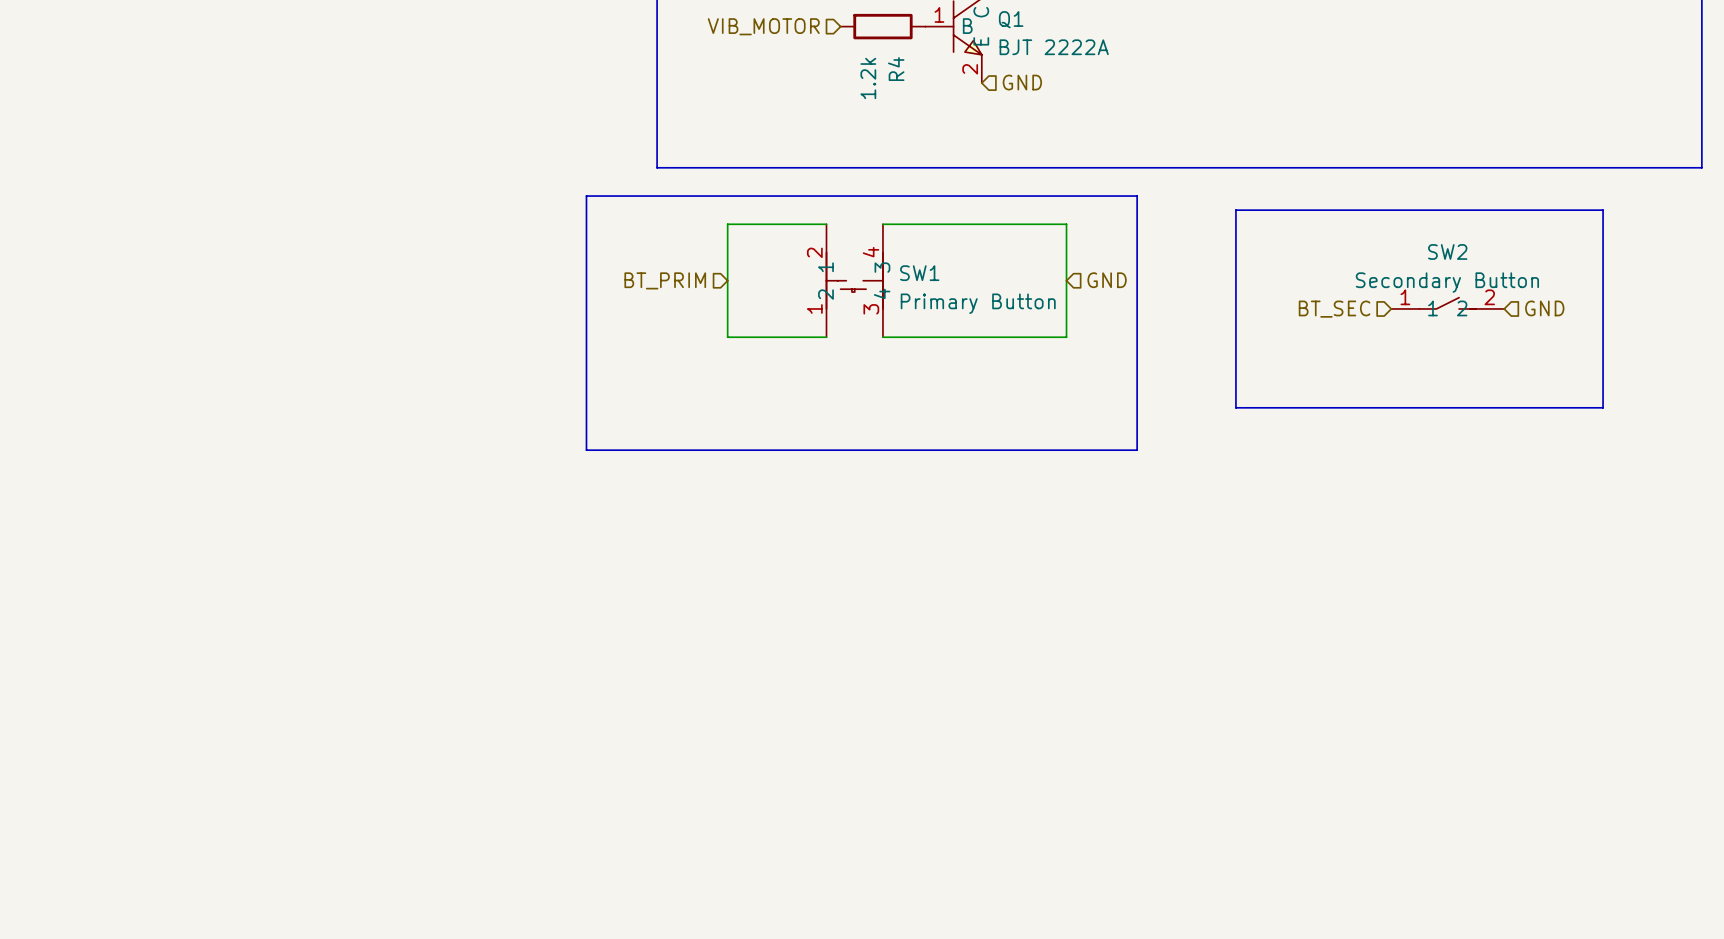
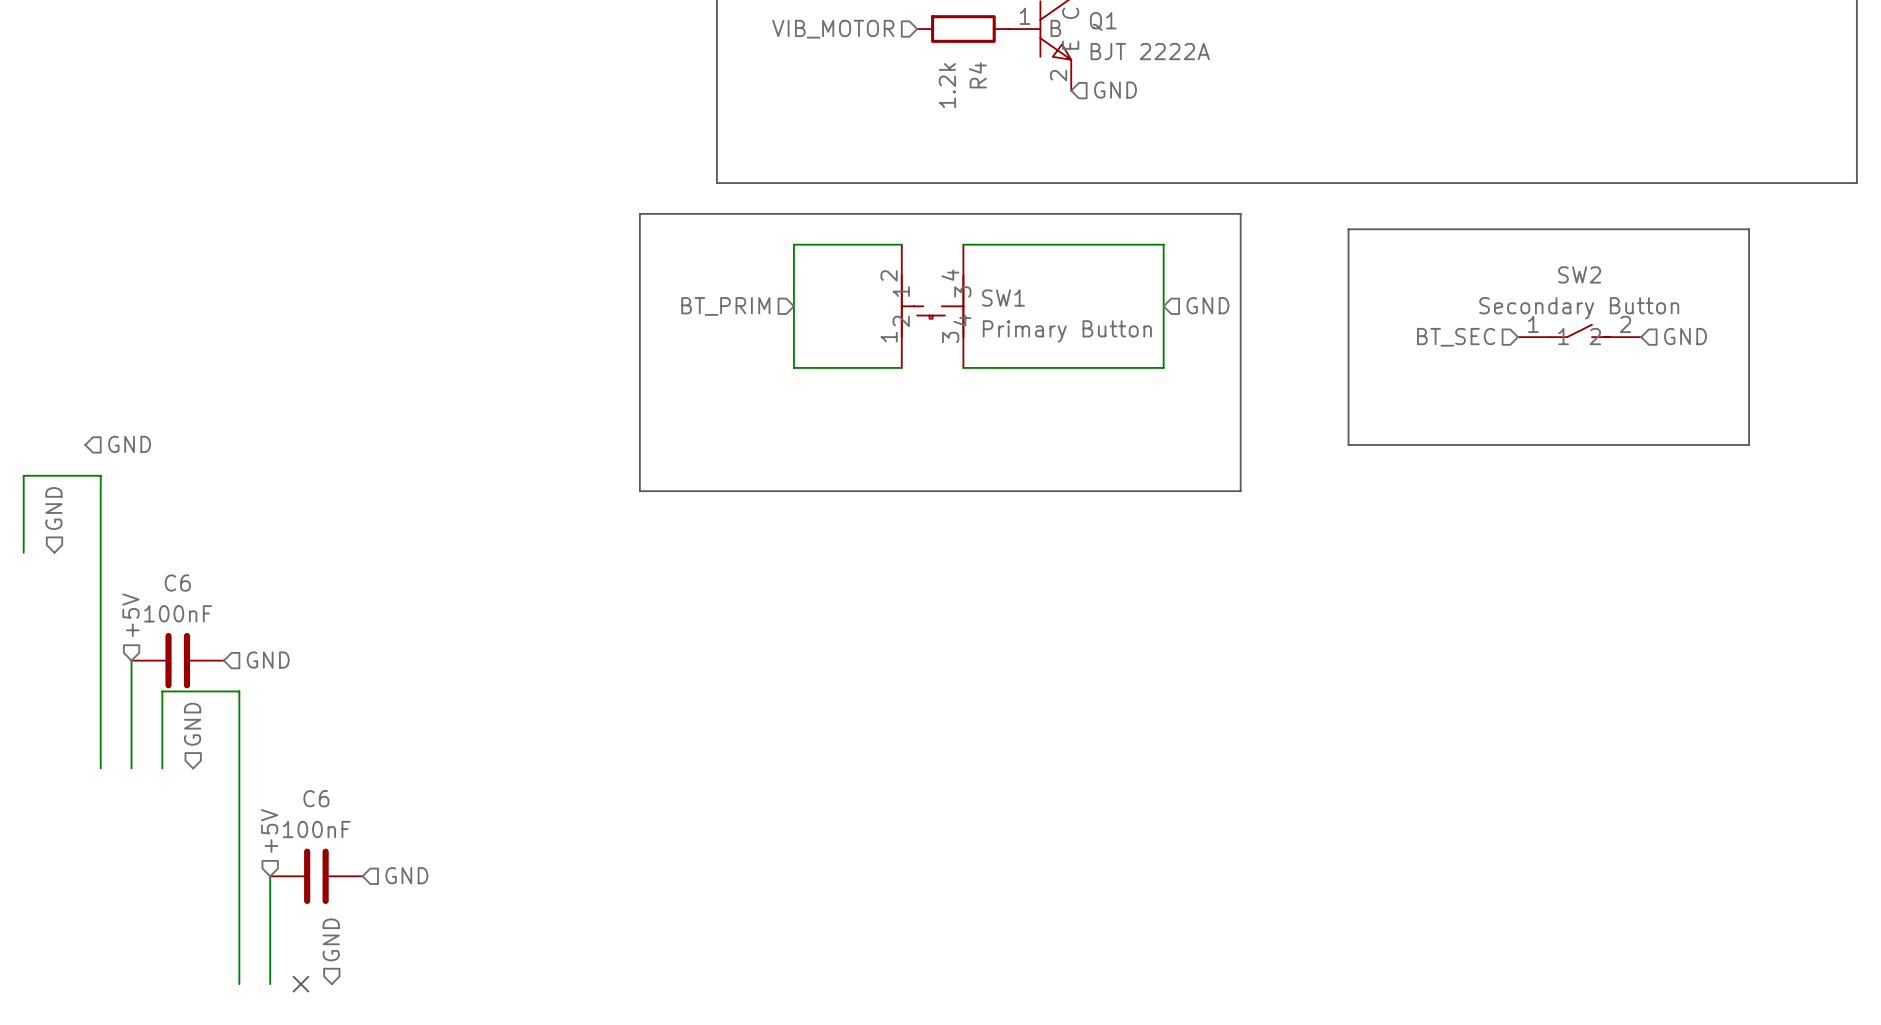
hierarchical label: none -> GND (129, 444)
hierarchical label: none -> GND (53, 508)
wire: none -> (23, 552) (23, 475) (100, 475) (100, 768)
hierarchical label: none -> +5V (130, 615)
hierarchical label: none -> GND (268, 660)
wire: none -> (131, 660) (131, 768)
C6: none -> 100nF (177, 660)
hierarchical label: none -> GND (192, 724)
wire: none -> (162, 768) (162, 691) (239, 691) (239, 984)
hierarchical label: none -> +5V (269, 830)
hierarchical label: none -> GND (406, 875)
wire: none -> (270, 876) (270, 984)
C6: none -> 100nF (316, 876)
hierarchical label: none -> GND (331, 939)
no-connect mark: none -> (300, 984)

